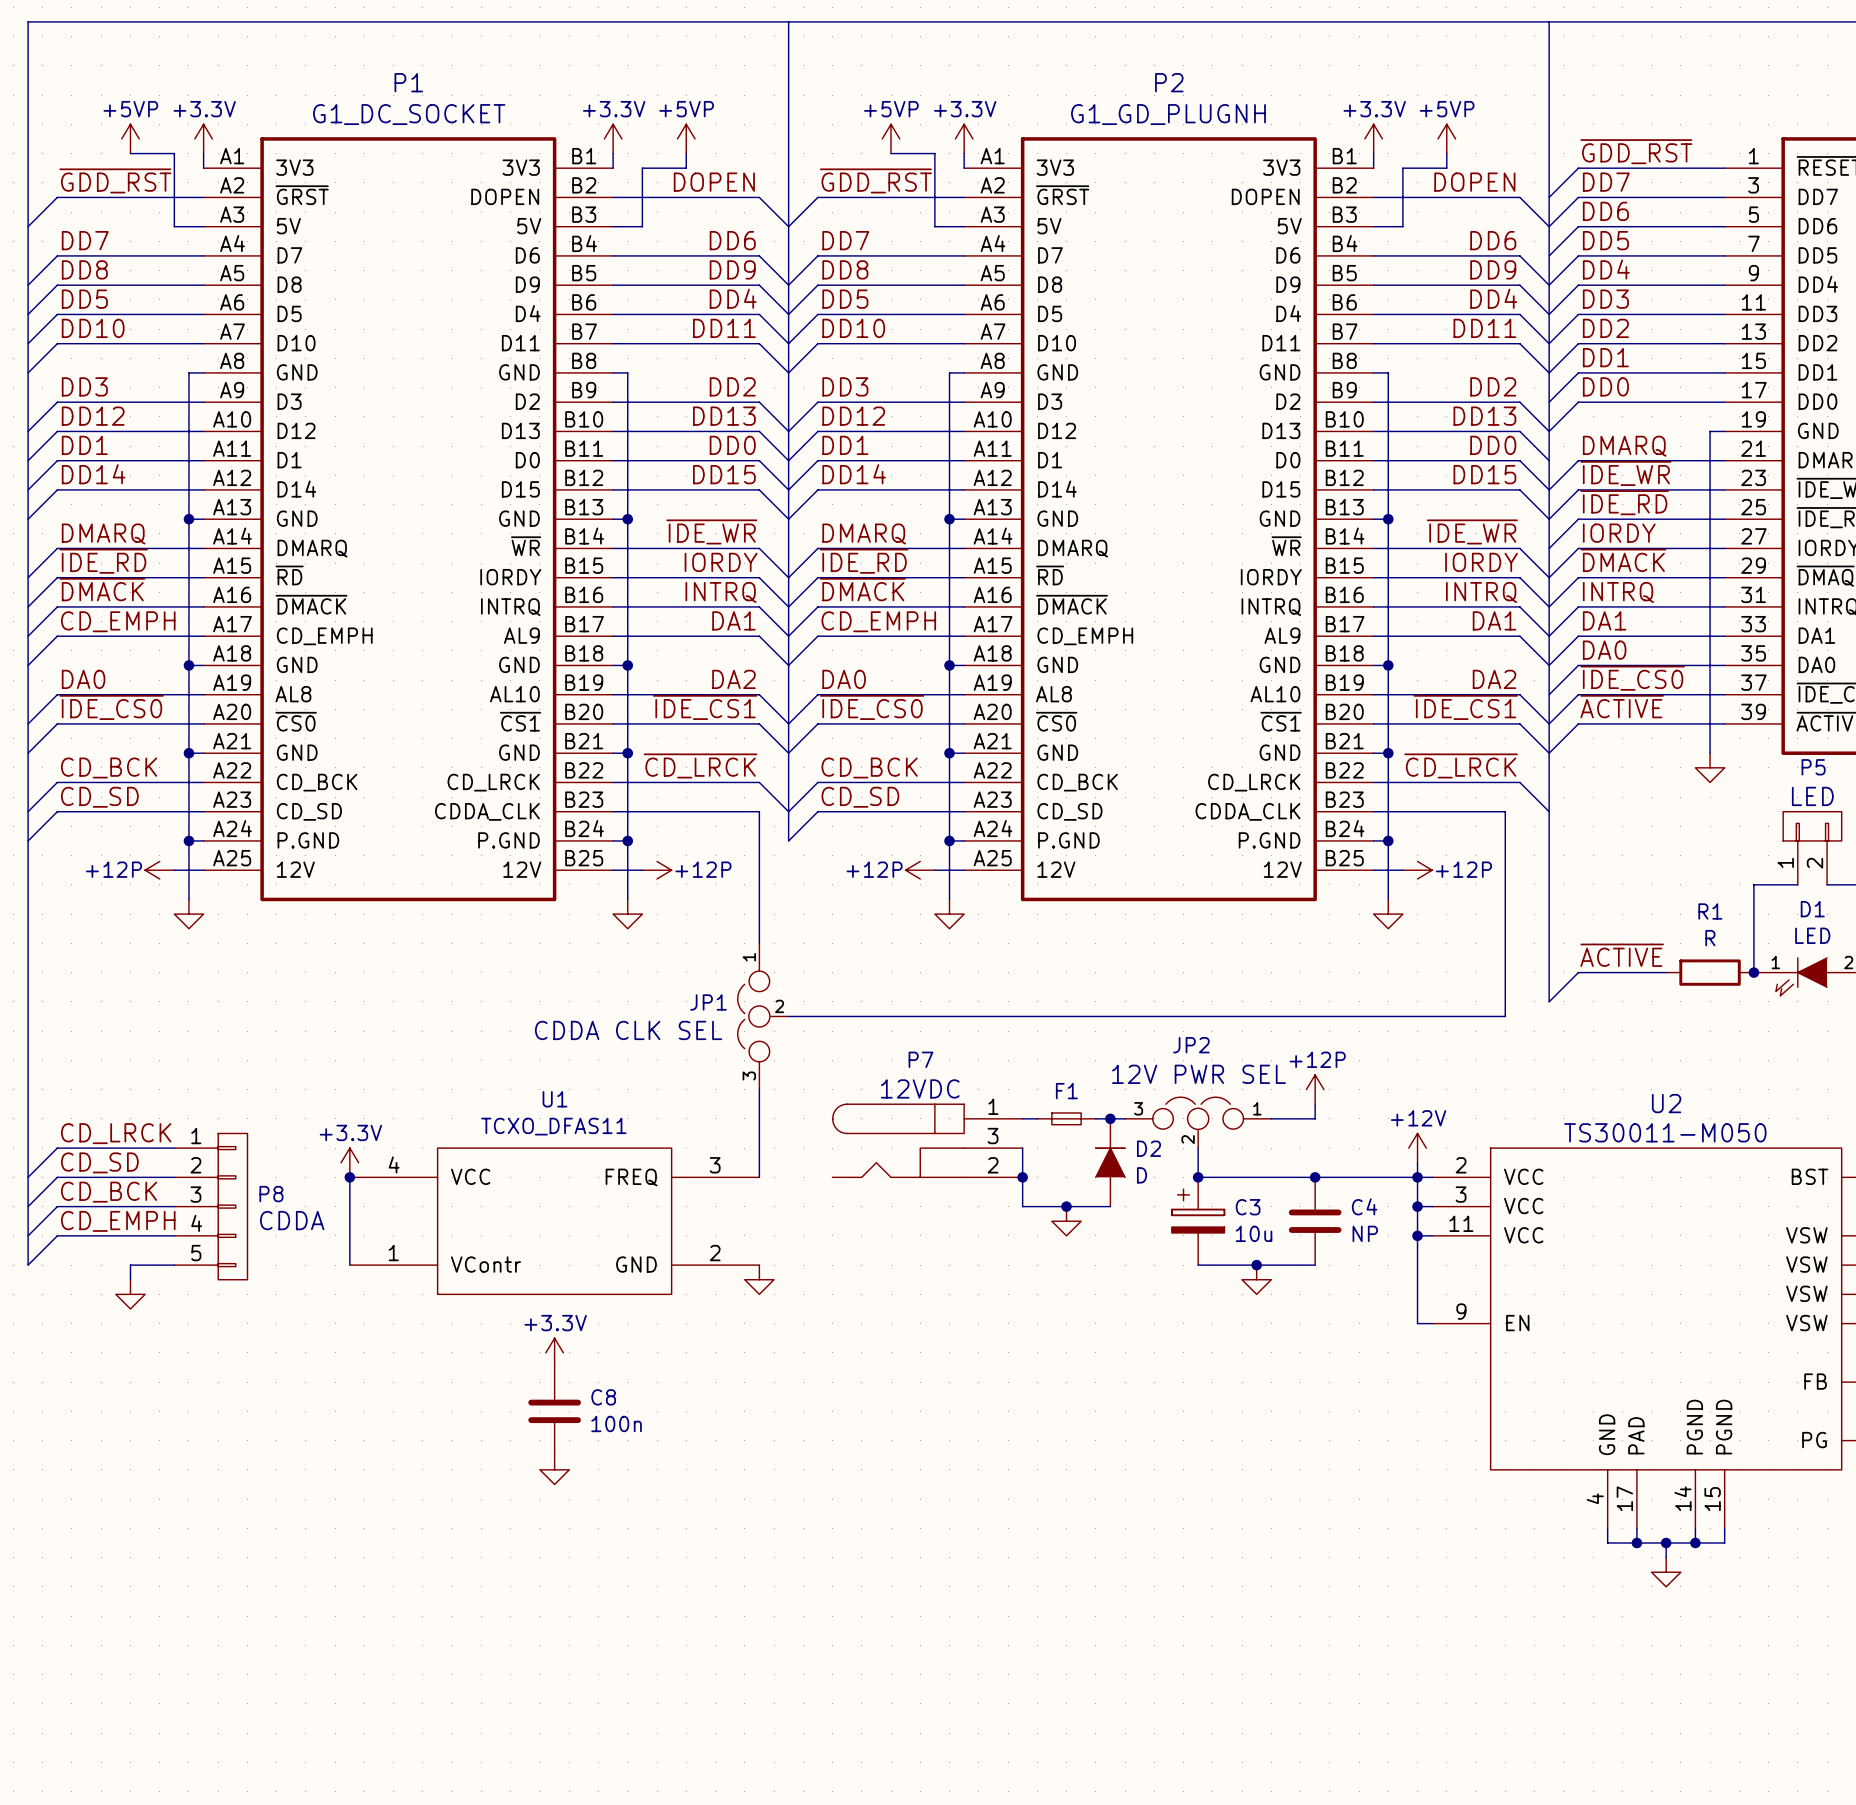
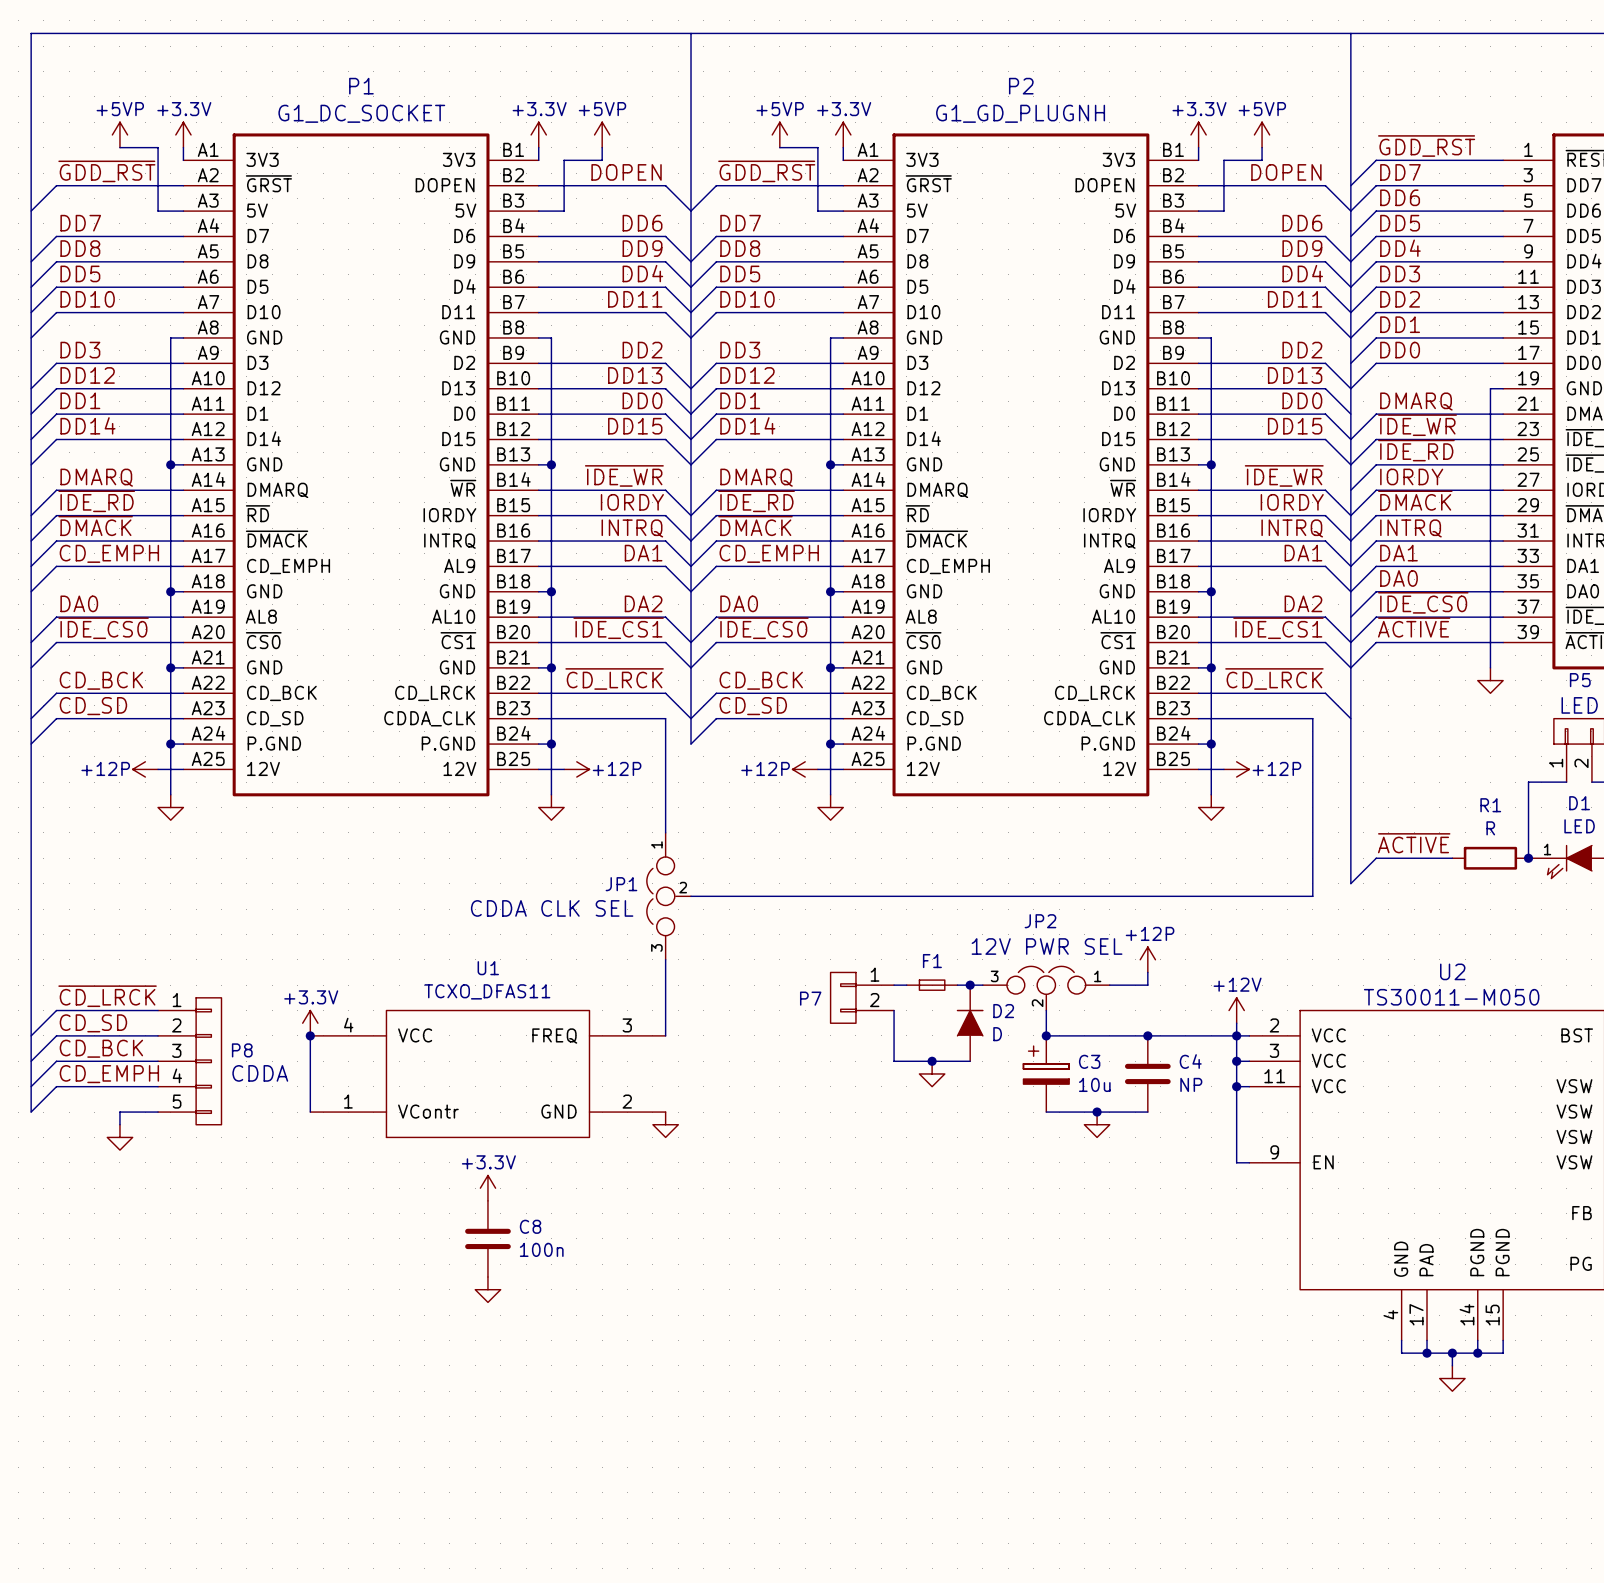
P7 name position: P7 (920, 1059) -> P7 (810, 998)
P7 text: 12VDC (920, 1088) -> none
P7 symbol: [832, 1104, 1023, 1178] -> [830, 972, 895, 1024]
label: CD_LRCK (116, 1133) -> ~{CD_LRCK} (107, 996)
junction: (1022, 1177) -> none

